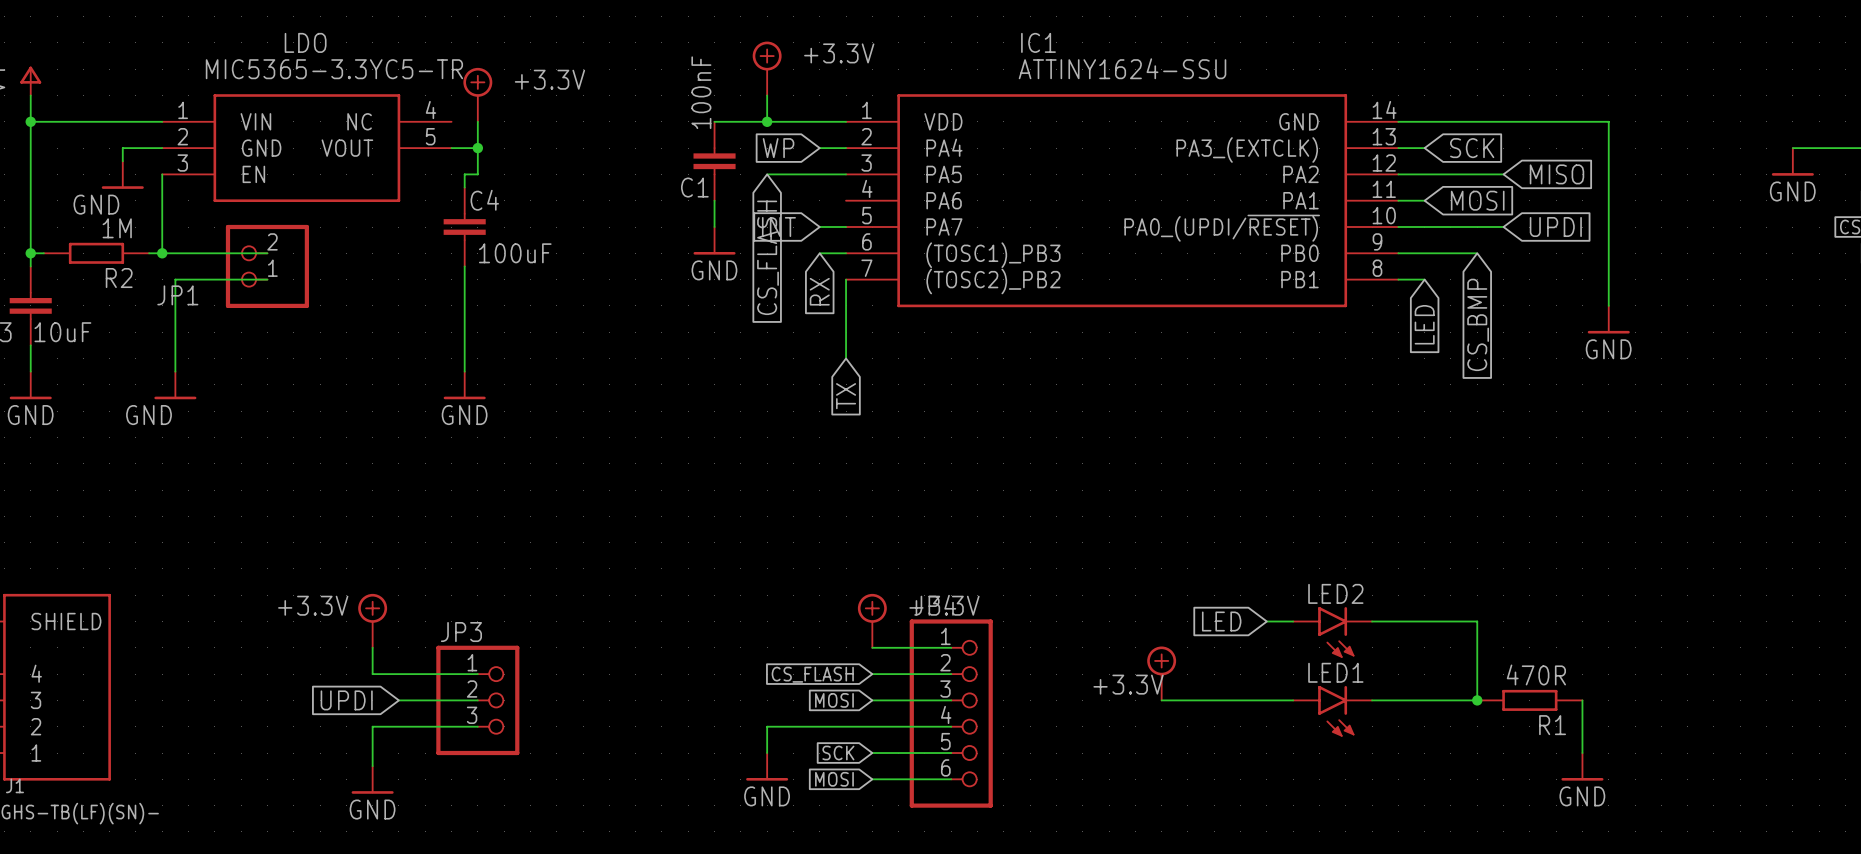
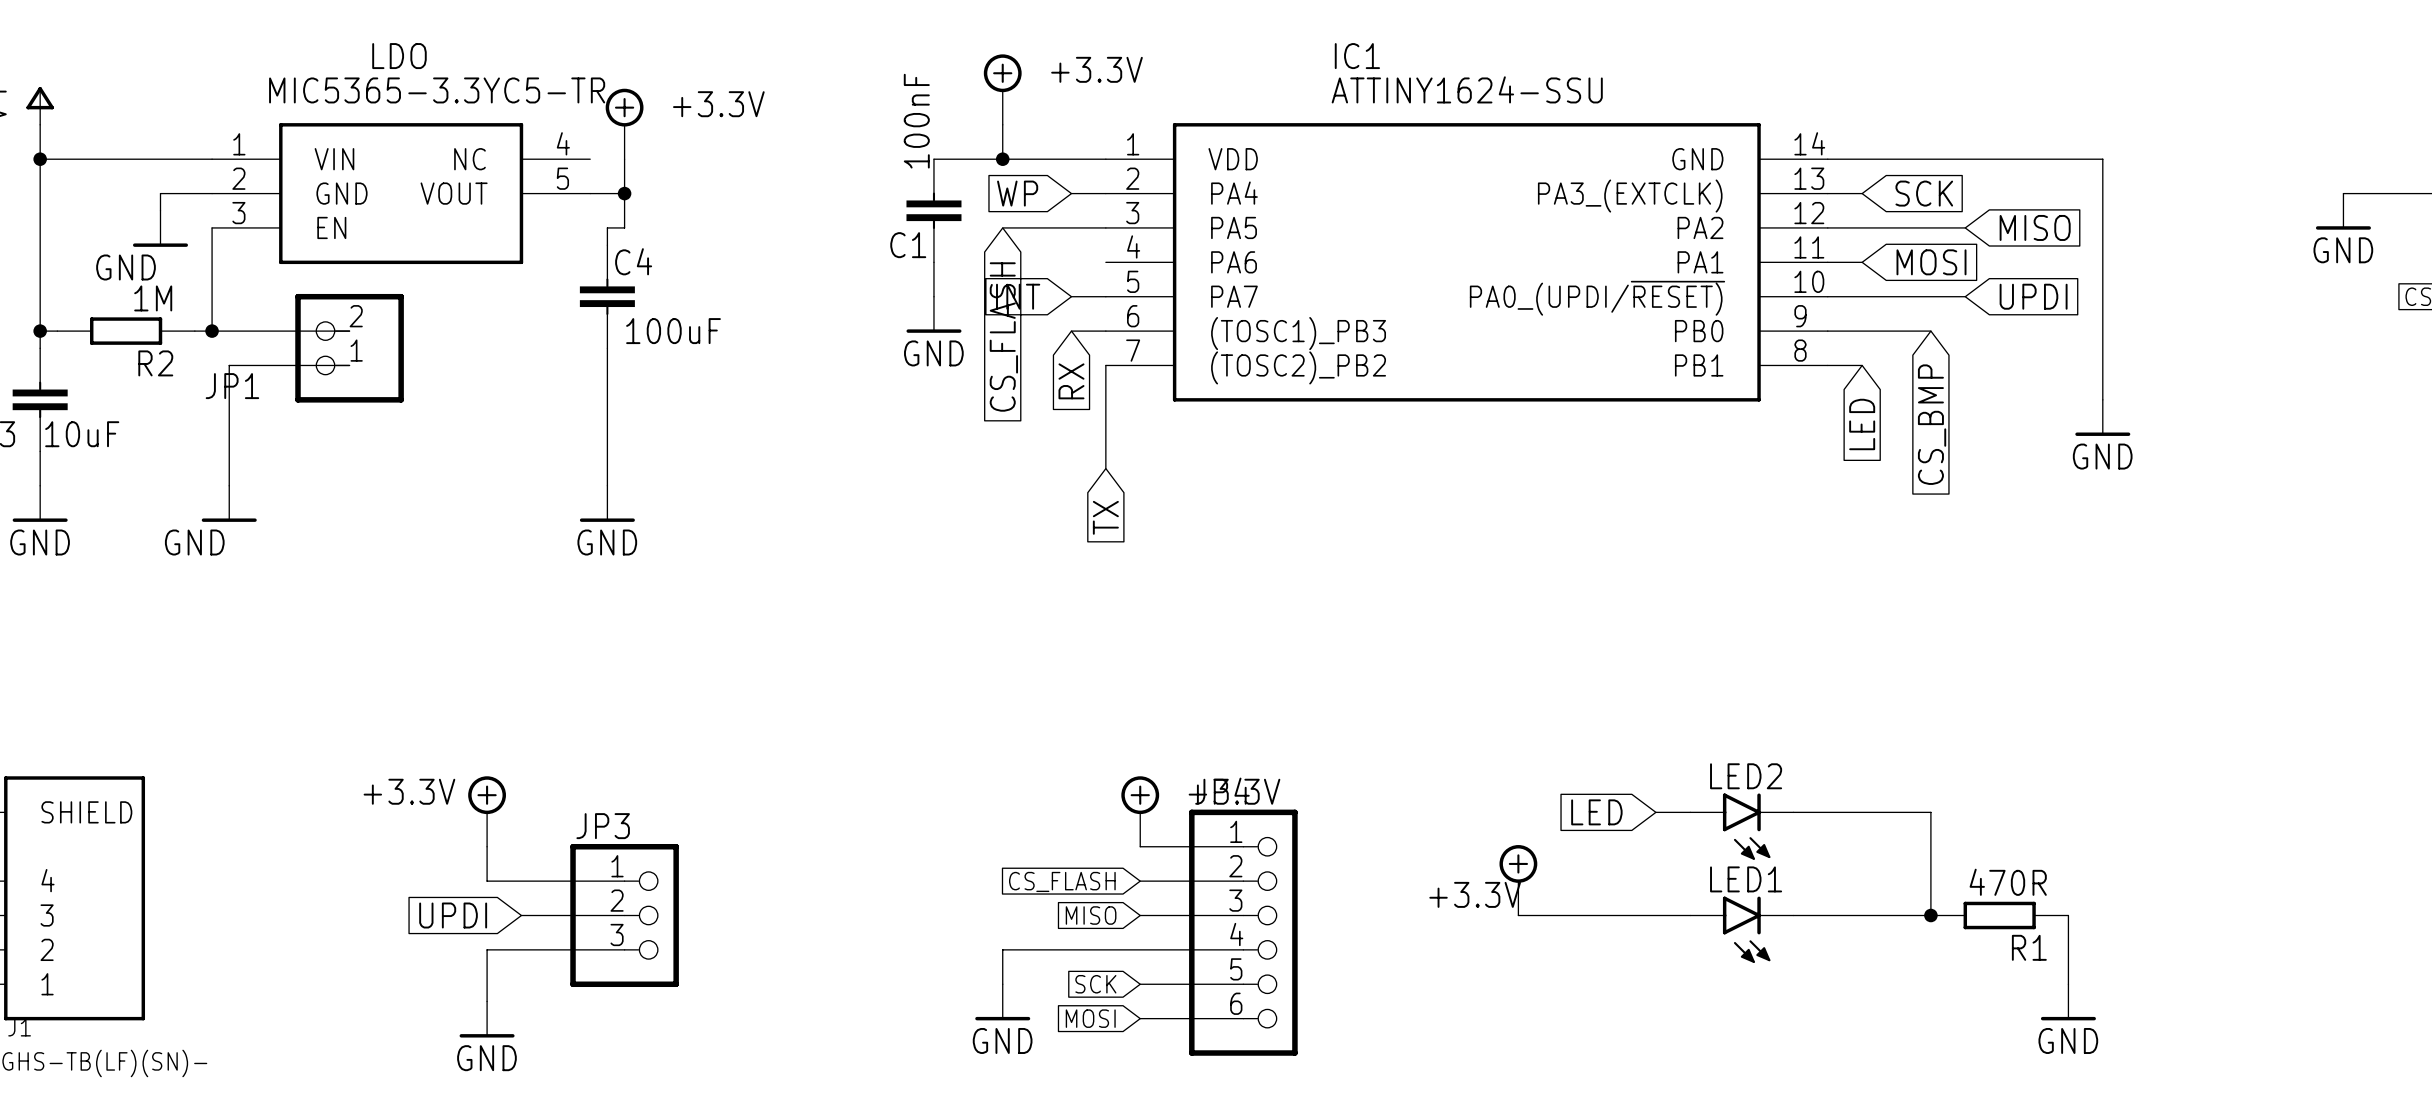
global label: MOSI (834, 700) -> MISO (1091, 915)

